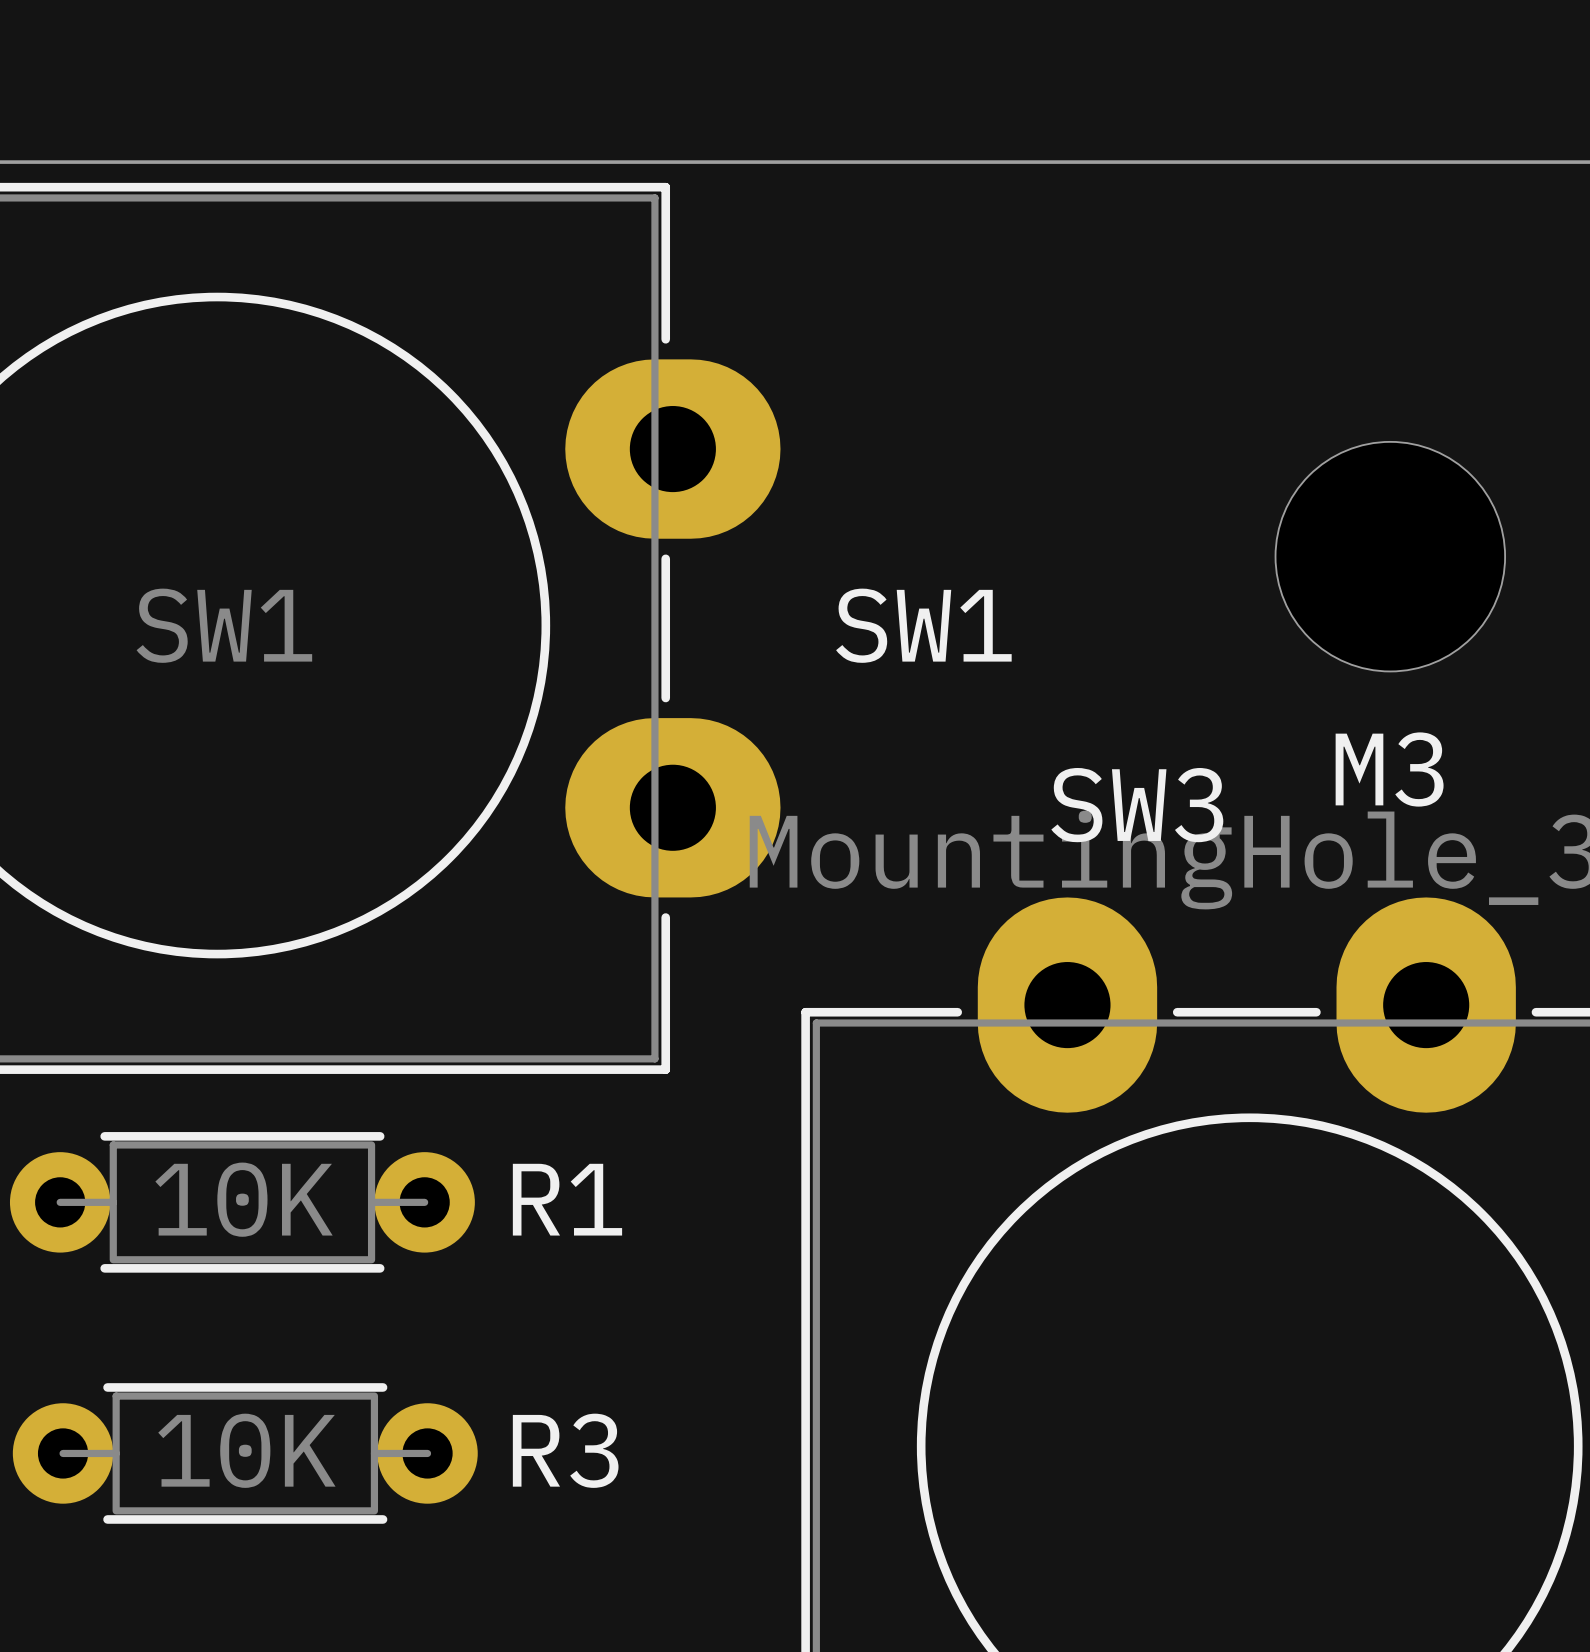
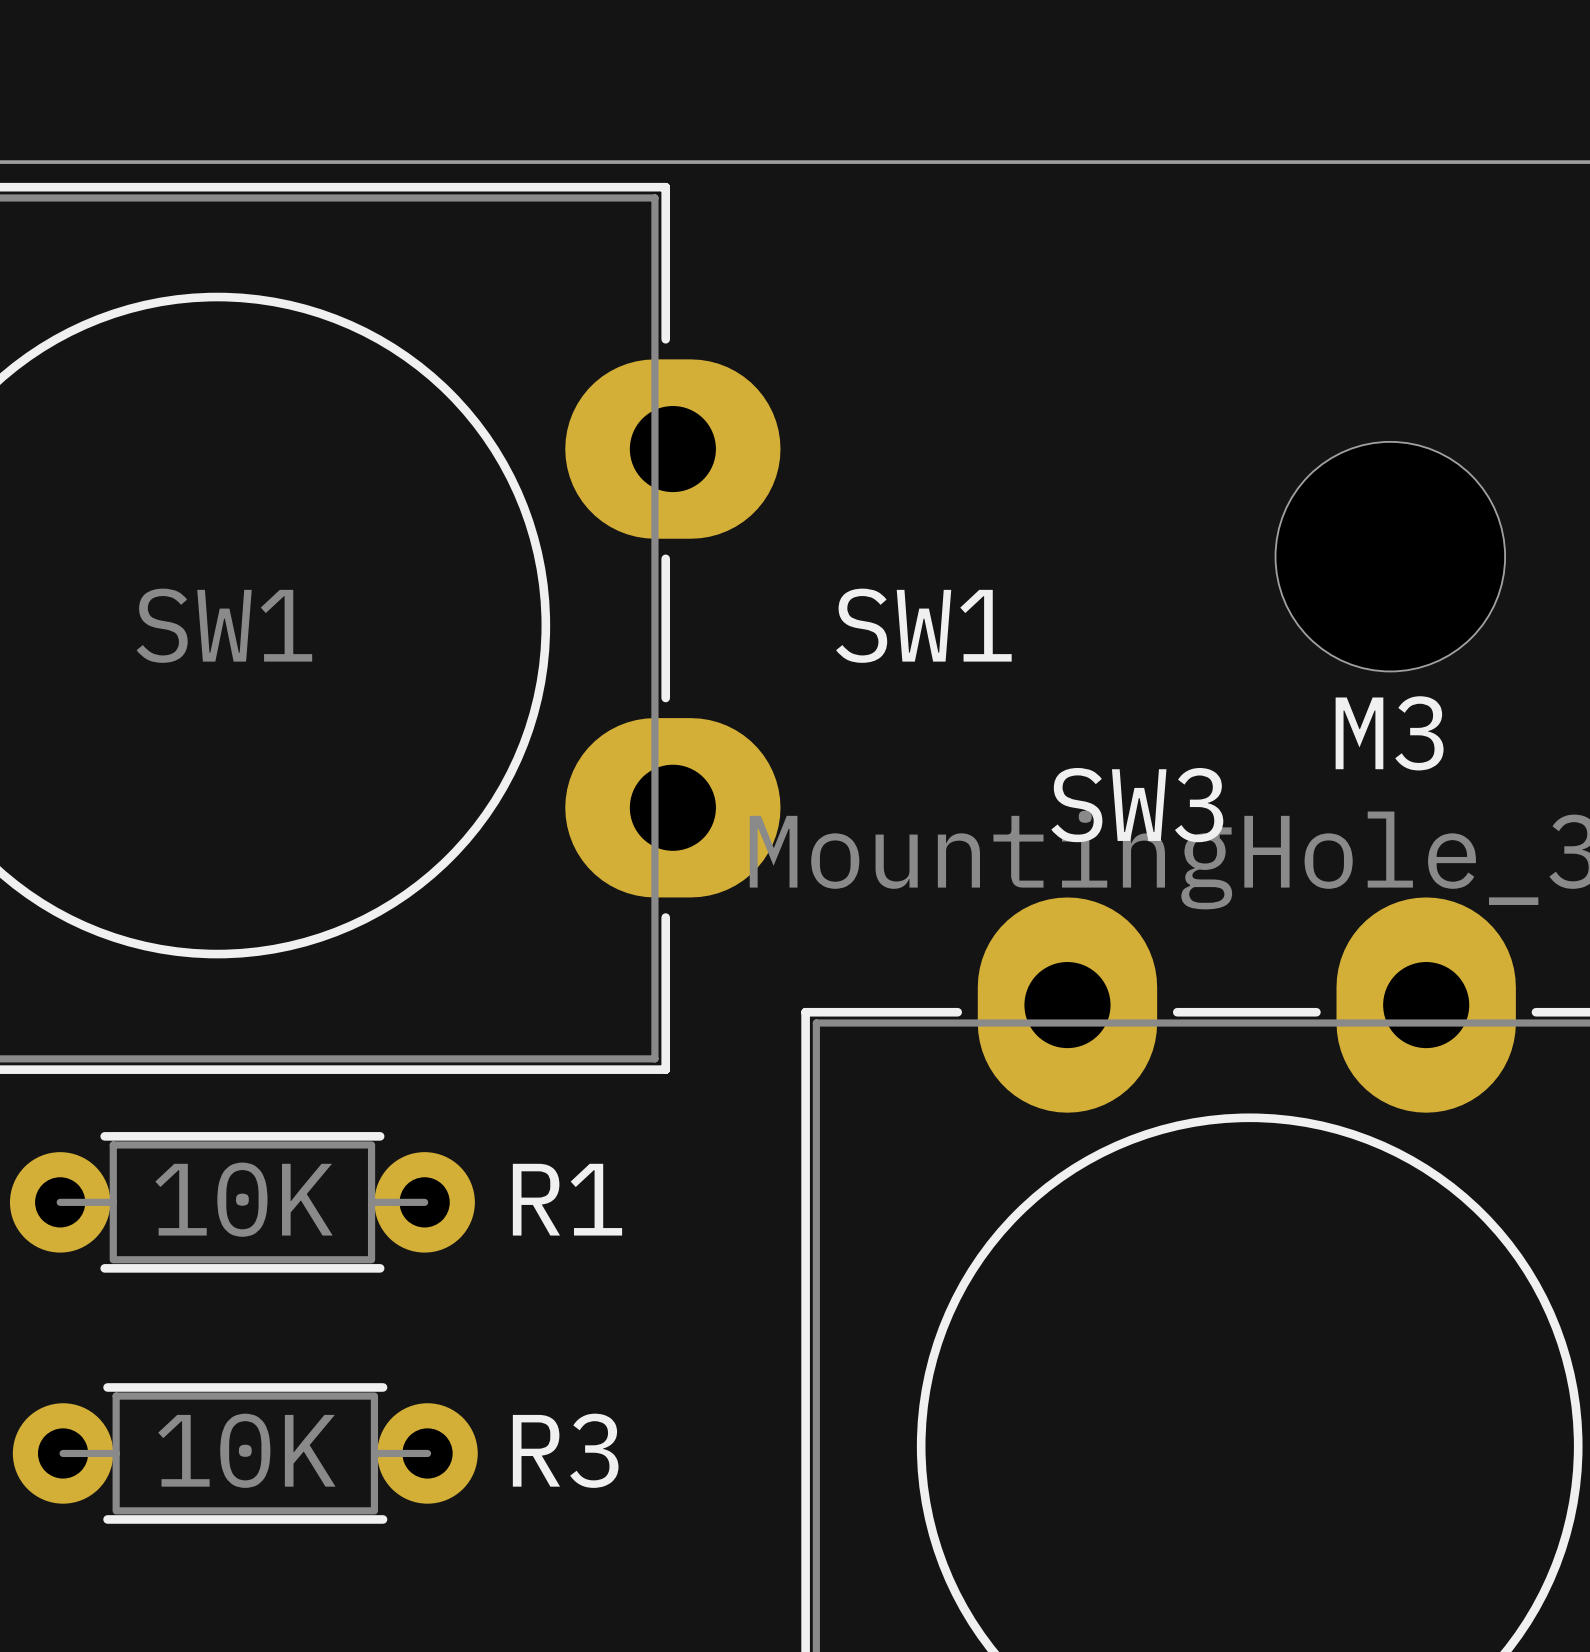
M3 name position: M3 (1389, 769) -> M3 (1389, 733)

